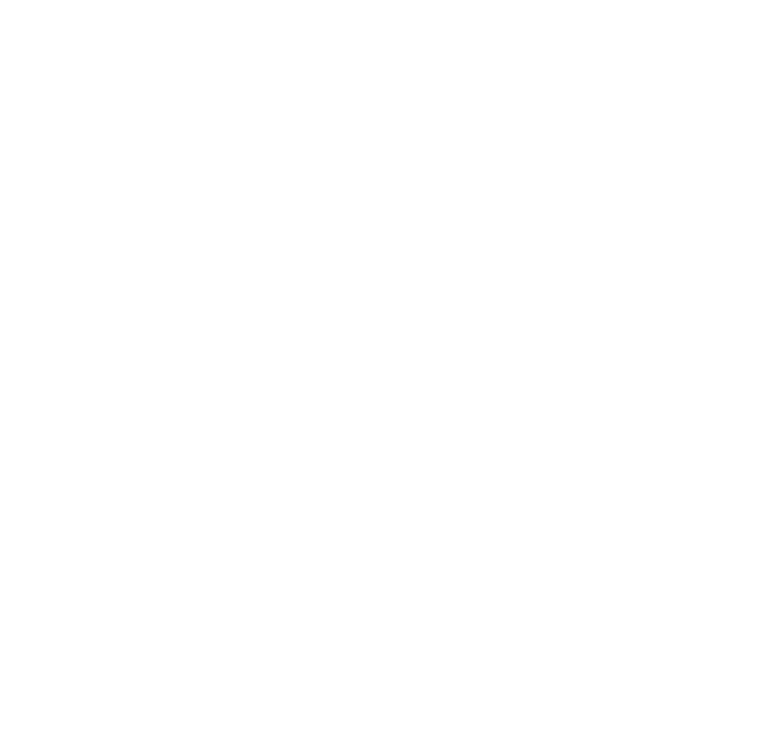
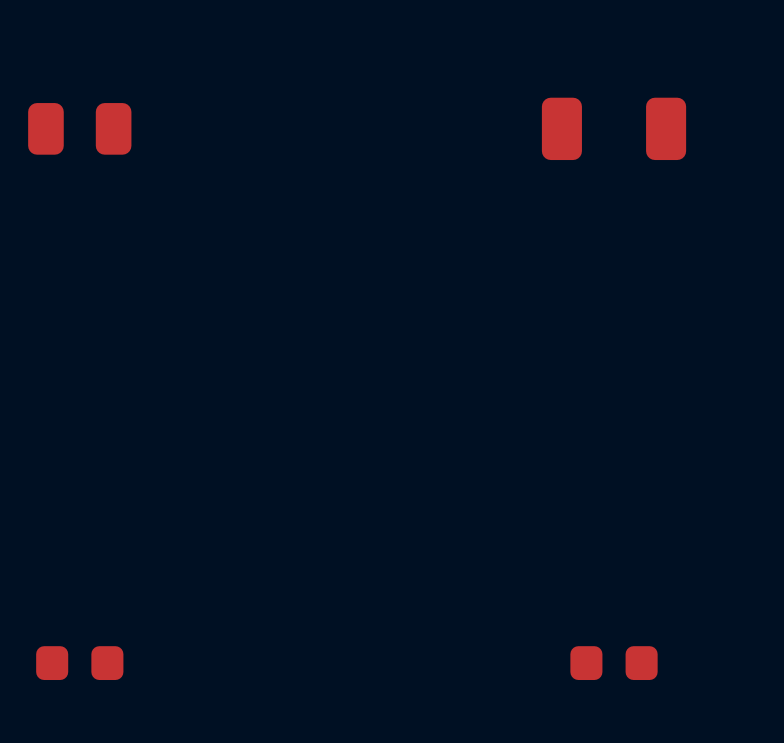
part: none -> (79, 128)
part: none -> (614, 128)
part: none -> (79, 663)
part: none -> (614, 663)

